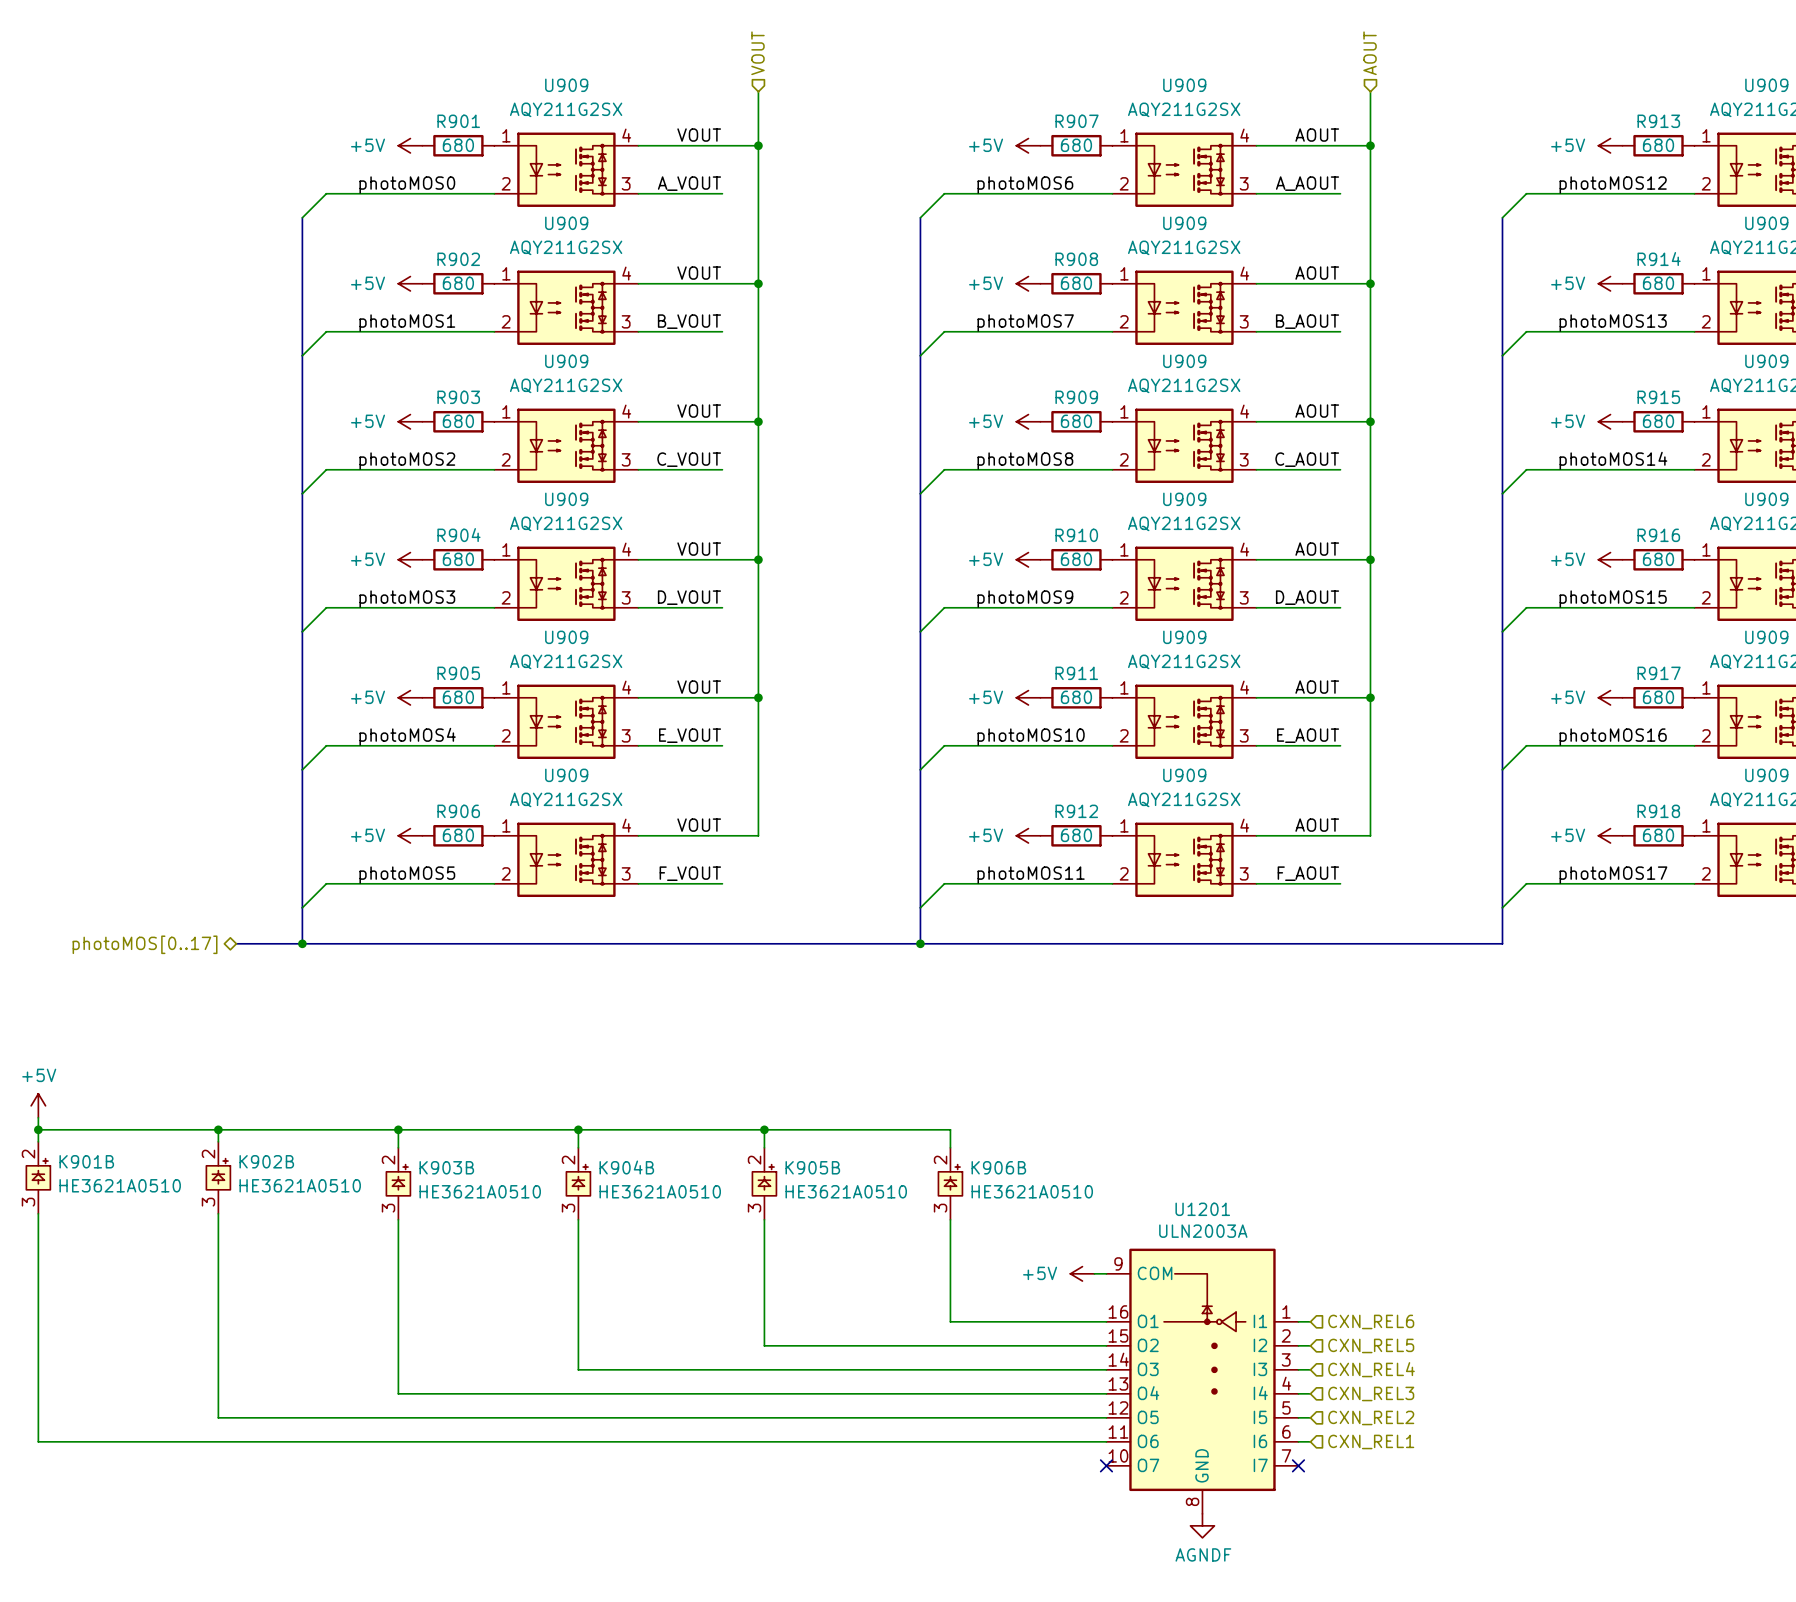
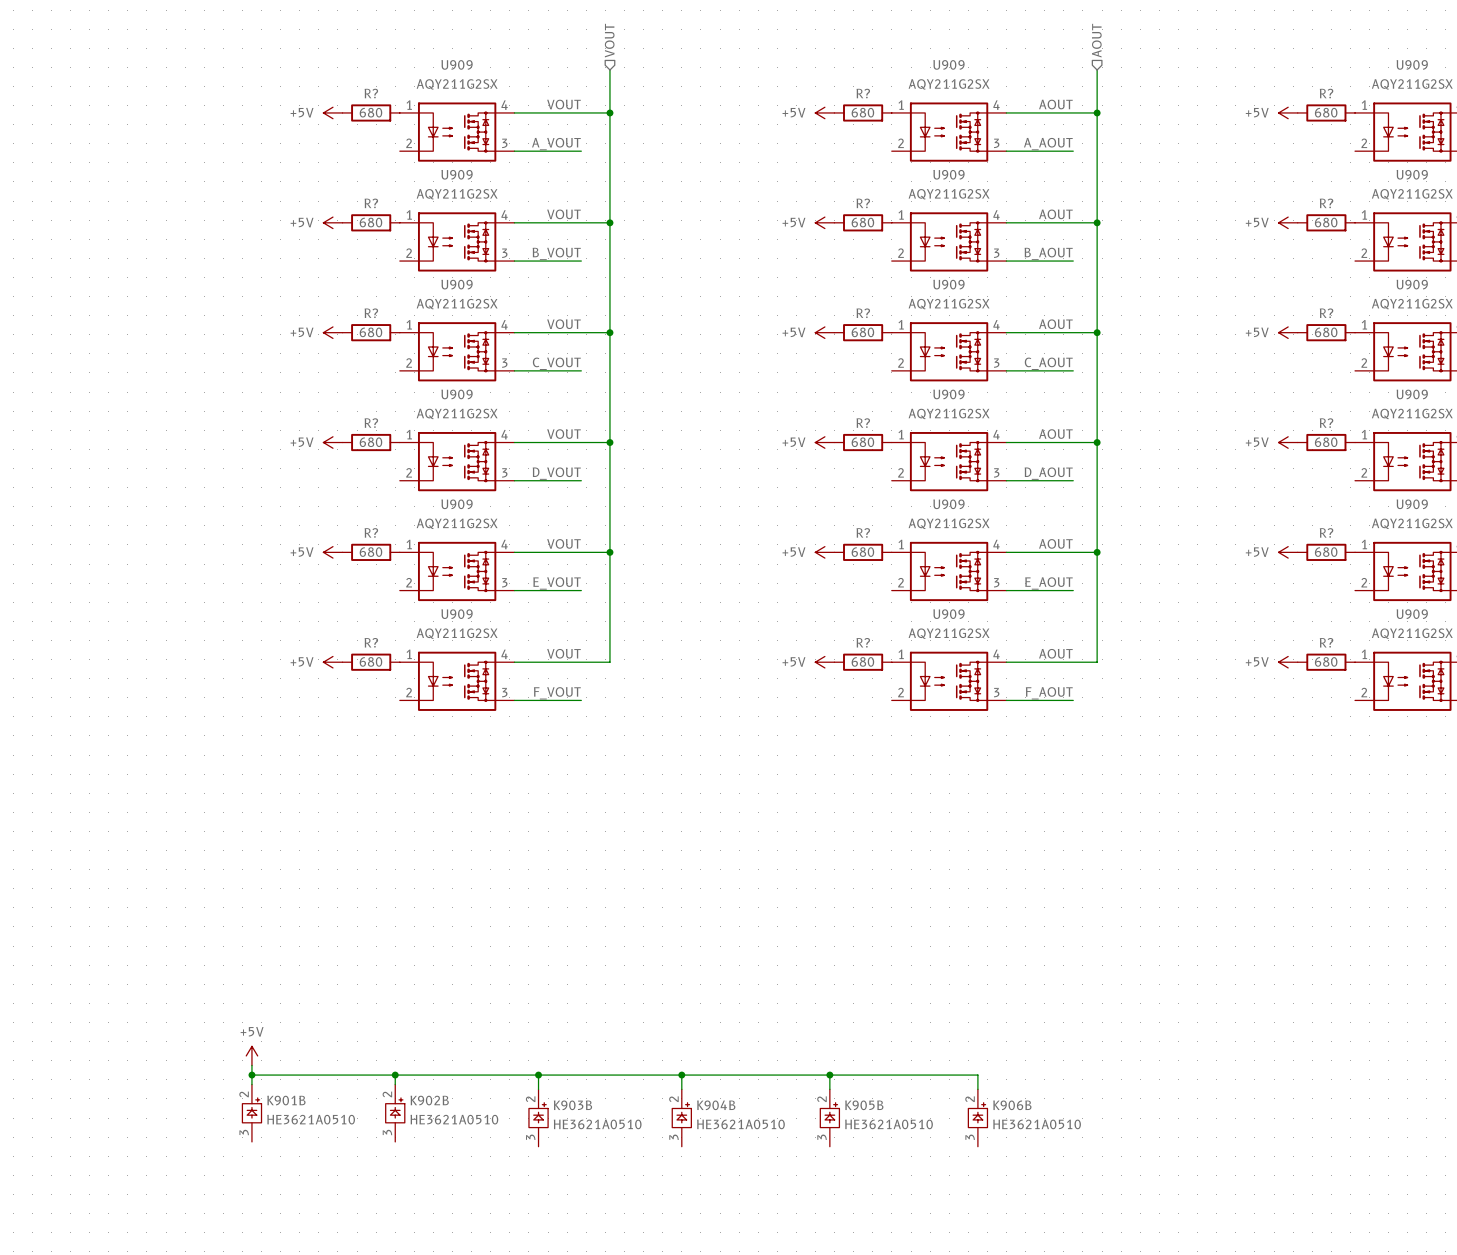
R901 name: R901 (458, 121) -> R? (371, 93)
R907 name: R907 (1077, 121) -> R? (863, 93)
R913 name: R913 (1658, 121) -> R? (1326, 93)
label: photoMOS0 (407, 185) -> none
label: photoMOS6 (1025, 185) -> none
label: photoMOS12 (1613, 185) -> none
wire: (494, 193) (326, 193) (302, 217) -> none
wire: (1112, 193) (944, 193) (920, 217) -> none
wire: (1694, 193) (1526, 193) (1502, 217) -> none
bus: (302, 217) (302, 943) -> none
bus: (920, 217) (920, 943) -> none
bus: (1502, 217) (1502, 943) (236, 943) -> none
R902 name: R902 (458, 259) -> R? (371, 203)
R908 name: R908 (1076, 259) -> R? (863, 203)
R914 name: R914 (1659, 259) -> R? (1326, 203)
label: photoMOS1 (407, 323) -> none
label: photoMOS7 (1025, 323) -> none
label: photoMOS13 (1613, 323) -> none
wire: (494, 331) (326, 331) (302, 355) -> none
wire: (1112, 331) (944, 331) (920, 355) -> none
wire: (1694, 331) (1526, 331) (1502, 355) -> none
R903 name: R903 (458, 397) -> R? (371, 313)
R909 name: R909 (1076, 397) -> R? (863, 313)
R915 name: R915 (1658, 397) -> R? (1326, 313)
label: photoMOS14 (1613, 460) -> none
label: photoMOS2 (407, 461) -> none
label: photoMOS8 (1025, 461) -> none
wire: (494, 469) (326, 469) (302, 493) -> none
wire: (1112, 469) (944, 469) (920, 493) -> none
wire: (1694, 469) (1526, 469) (1502, 493) -> none
R904 name: R904 (458, 535) -> R? (371, 423)
R910 name: R910 (1076, 535) -> R? (863, 423)
R916 name: R916 (1658, 535) -> R? (1326, 423)
label: photoMOS3 (407, 599) -> none
label: photoMOS9 (1025, 599) -> none
label: photoMOS15 (1613, 599) -> none
wire: (494, 607) (326, 607) (302, 631) -> none
wire: (1112, 607) (944, 607) (920, 631) -> none
wire: (1694, 607) (1526, 607) (1502, 631) -> none
R905 name: R905 (458, 673) -> R? (371, 532)
R911 name: R911 (1076, 673) -> R? (863, 532)
R917 name: R917 (1659, 673) -> R? (1326, 532)
label: photoMOS4 (407, 736) -> none
label: photoMOS10 (1031, 737) -> none
label: photoMOS16 (1613, 737) -> none
wire: (494, 745) (326, 745) (302, 769) -> none
wire: (1112, 745) (944, 745) (920, 769) -> none
wire: (1694, 745) (1526, 745) (1502, 769) -> none
R906 name: R906 (458, 811) -> R? (371, 642)
R912 name: R912 (1076, 811) -> R? (863, 642)
R918 name: R918 (1658, 811) -> R? (1326, 642)
label: photoMOS5 (407, 875) -> none
label: photoMOS11 (1031, 875) -> none
label: photoMOS17 (1613, 875) -> none
wire: (494, 883) (326, 883) (302, 907) -> none
wire: (1112, 883) (944, 883) (920, 907) -> none
wire: (1694, 883) (1526, 883) (1502, 907) -> none
junction: (302, 943) -> none
junction: (920, 943) -> none
hierarchical label: photoMOS[0..17] (145, 944) -> none
power symbol: +5V (38, 1105) -> none
wire: (38, 1117) (38, 1141) -> none
wire: (38, 1129) (950, 1129) (950, 1147) -> none
junction: (38, 1129) -> none
wire: (218, 1129) (218, 1141) -> none
junction: (218, 1129) -> none
wire: (398, 1129) (398, 1147) -> none
junction: (398, 1129) -> none
wire: (578, 1129) (578, 1147) -> none
junction: (578, 1129) -> none
wire: (764, 1129) (764, 1147) -> none
junction: (764, 1129) -> none
K901B position: (38, 1177) -> (251, 1113)
K902B position: (218, 1177) -> (395, 1113)
K903B position: (398, 1183) -> (538, 1118)
K904B position: (578, 1183) -> (681, 1118)
K905B position: (764, 1183) -> (829, 1118)
K906B position: (950, 1183) -> (977, 1118)
wire: (38, 1213) (38, 1441) (1106, 1441) -> none
wire: (218, 1213) (218, 1417) (1106, 1417) -> none
wire: (398, 1219) (398, 1393) (1106, 1393) -> none
wire: (578, 1219) (578, 1369) (1106, 1369) -> none
wire: (764, 1219) (764, 1345) (1106, 1345) -> none
wire: (950, 1219) (950, 1321) (1106, 1321) -> none
power symbol: +5V (1082, 1273) -> none
wire: (1094, 1273) (1106, 1273) -> none
wire: (1298, 1321) (1310, 1321) -> none
hierarchical label: CXN_REL6 (1371, 1321) -> none
power symbol: none -> +5V (251, 1055)
wire: none -> (251, 1065) (251, 1084)
wire: (1298, 1345) (1310, 1345) -> none
hierarchical label: CXN_REL5 (1371, 1345) -> none
wire: none -> (251, 1075) (977, 1075) (977, 1089)
junction: none -> (251, 1075)
wire: none -> (395, 1075) (395, 1084)
junction: none -> (395, 1075)
wire: none -> (538, 1075) (538, 1089)
junction: none -> (538, 1075)
wire: none -> (681, 1075) (681, 1089)
junction: none -> (681, 1075)
wire: none -> (829, 1075) (829, 1089)
junction: none -> (829, 1075)
wire: (1298, 1369) (1310, 1369) -> none
hierarchical label: CXN_REL4 (1371, 1369) -> none
U1201: ULN2003A (1202, 1381) -> none
wire: (1298, 1393) (1310, 1393) -> none
hierarchical label: CXN_REL3 (1371, 1393) -> none
wire: (1298, 1417) (1310, 1417) -> none
hierarchical label: CXN_REL2 (1371, 1417) -> none
wire: (1298, 1441) (1310, 1441) -> none
hierarchical label: CXN_REL1 (1371, 1441) -> none
no-connect mark: (1106, 1465) -> none
no-connect mark: (1298, 1465) -> none
power symbol: AGNDF (1202, 1525) -> none

